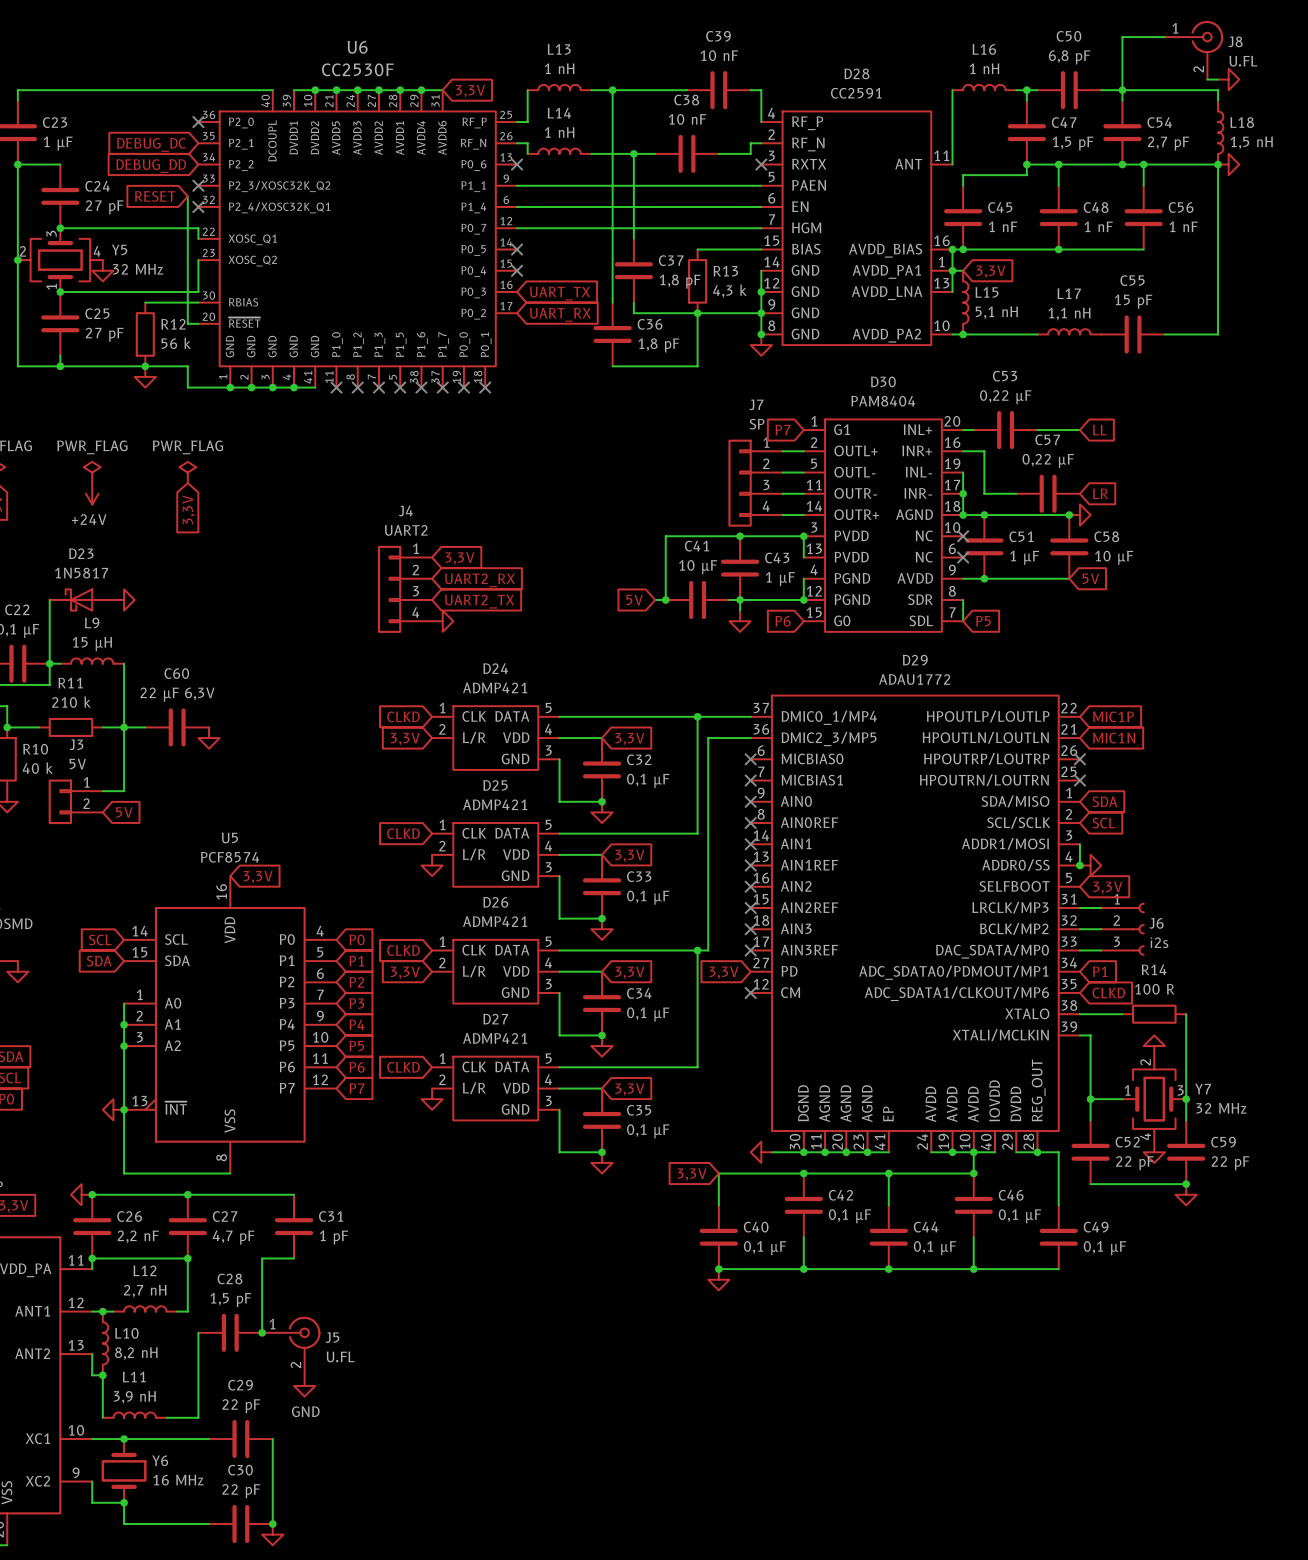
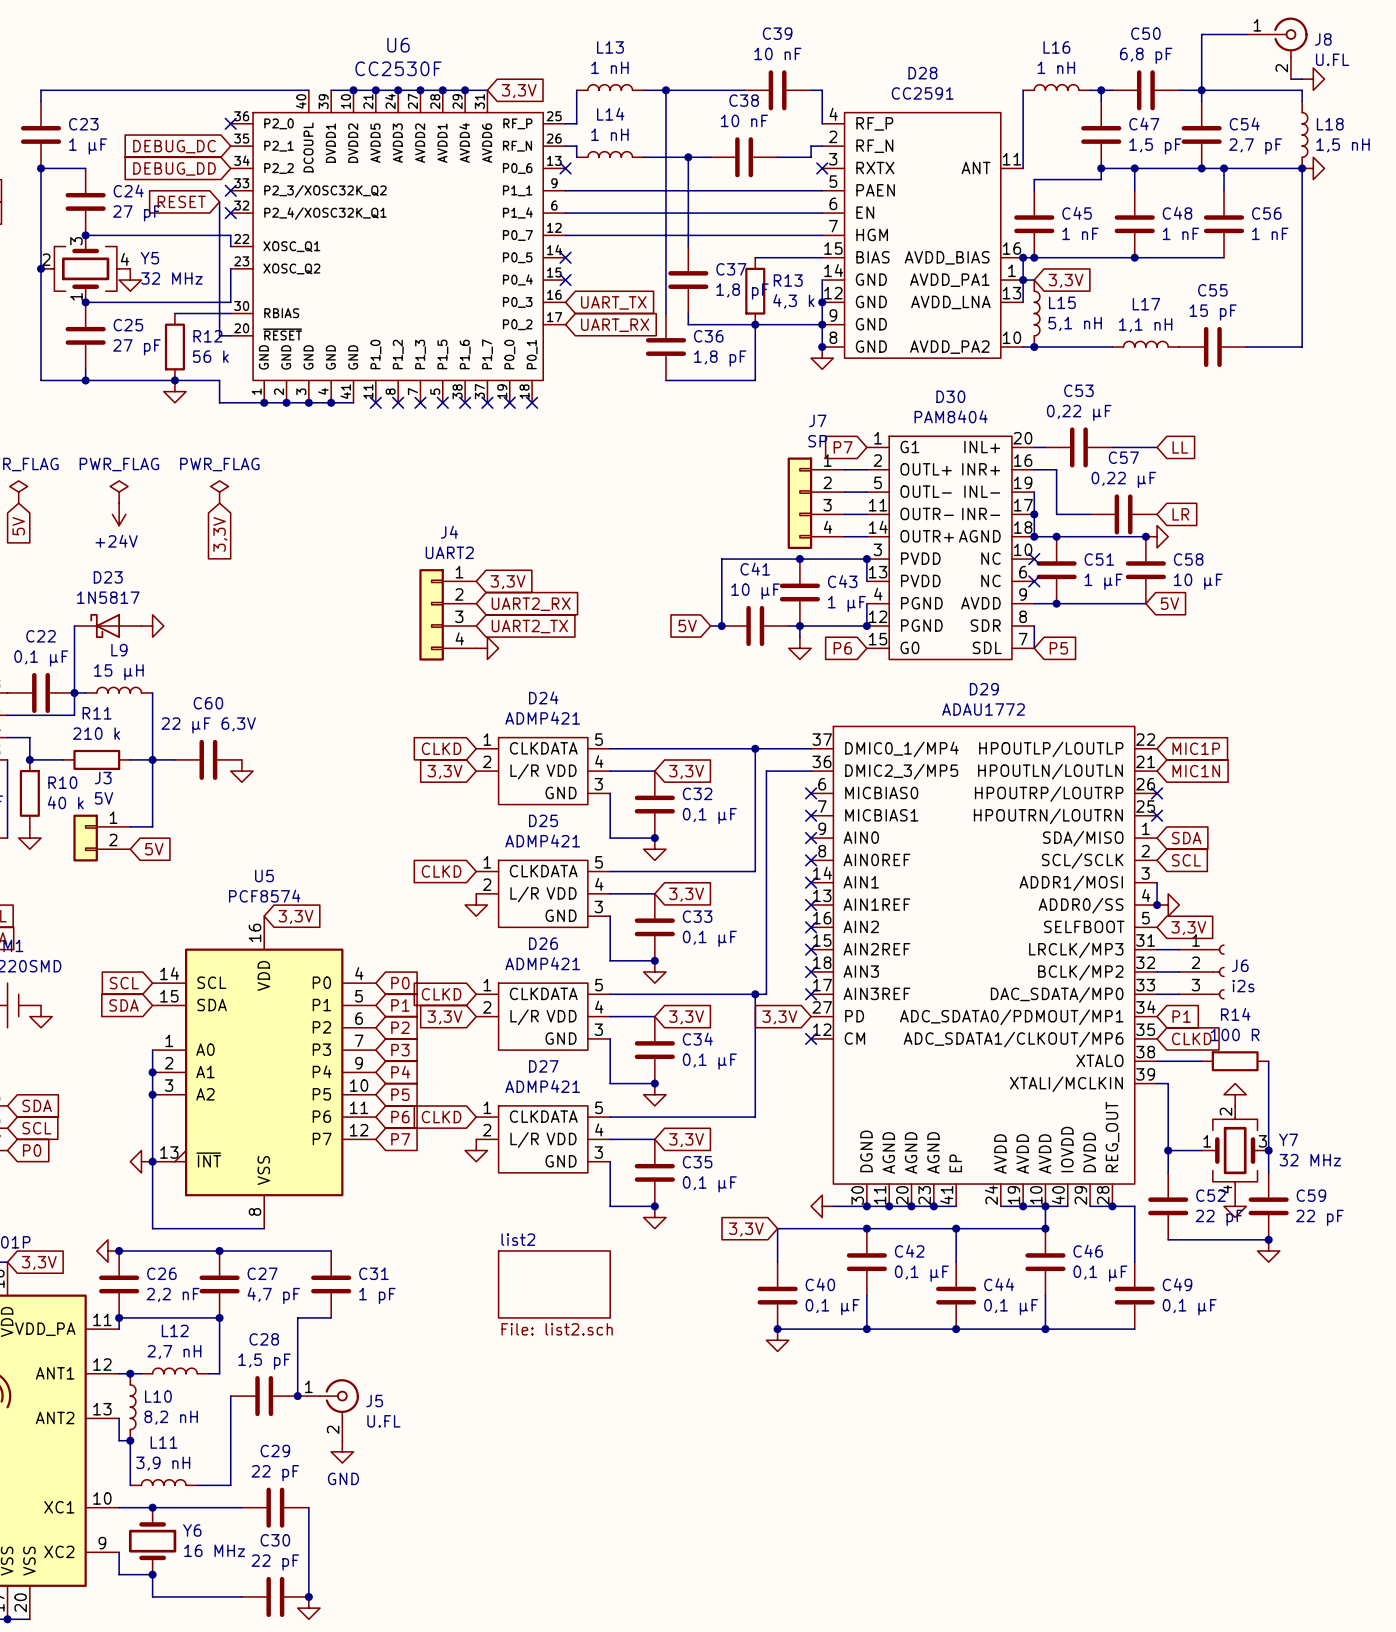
sheet list2: none -> File: list2.sch (554, 1284)

